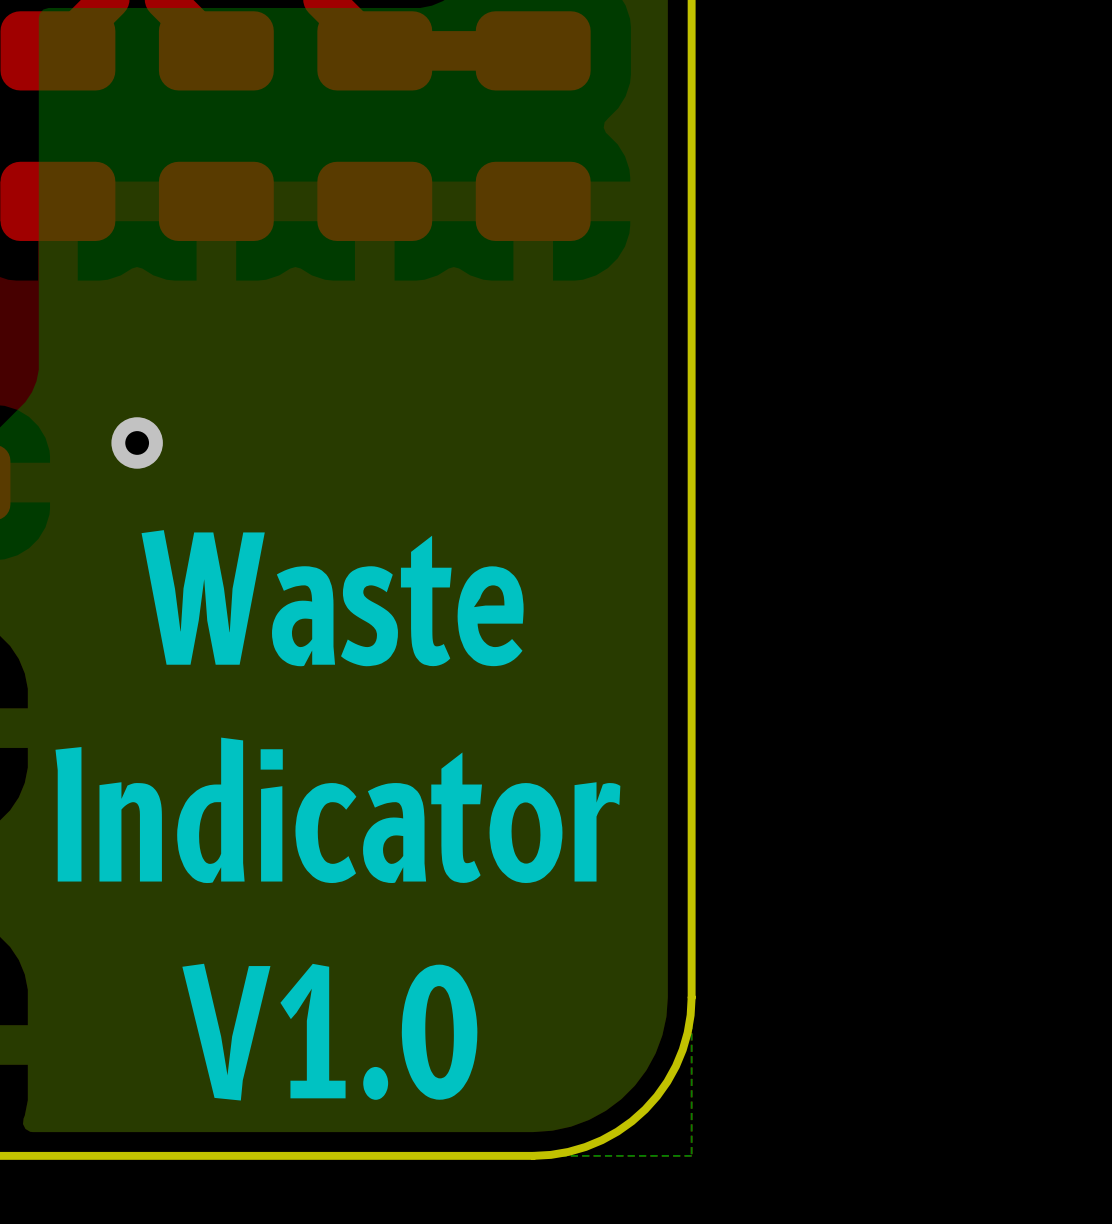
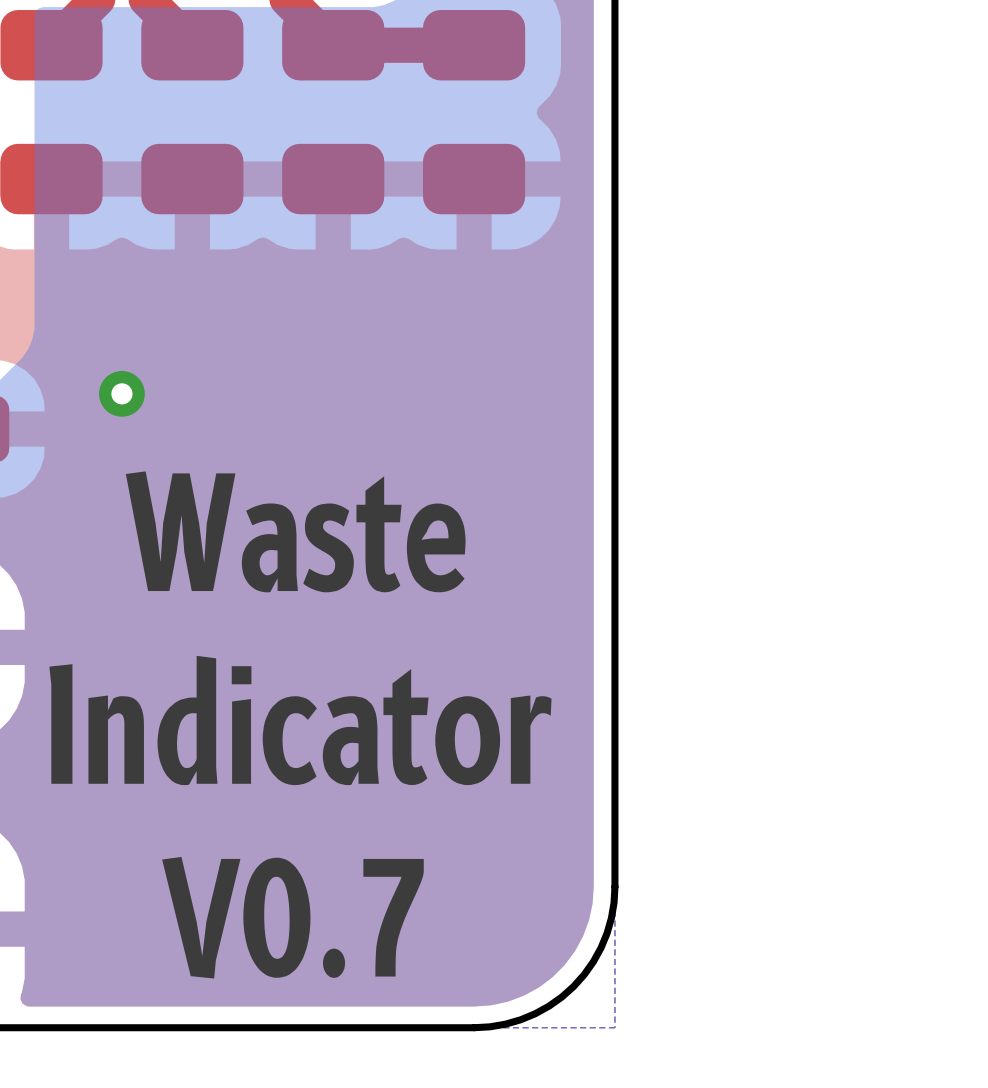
text: V1.0 (329, 1032) -> V0.7 (292, 917)

